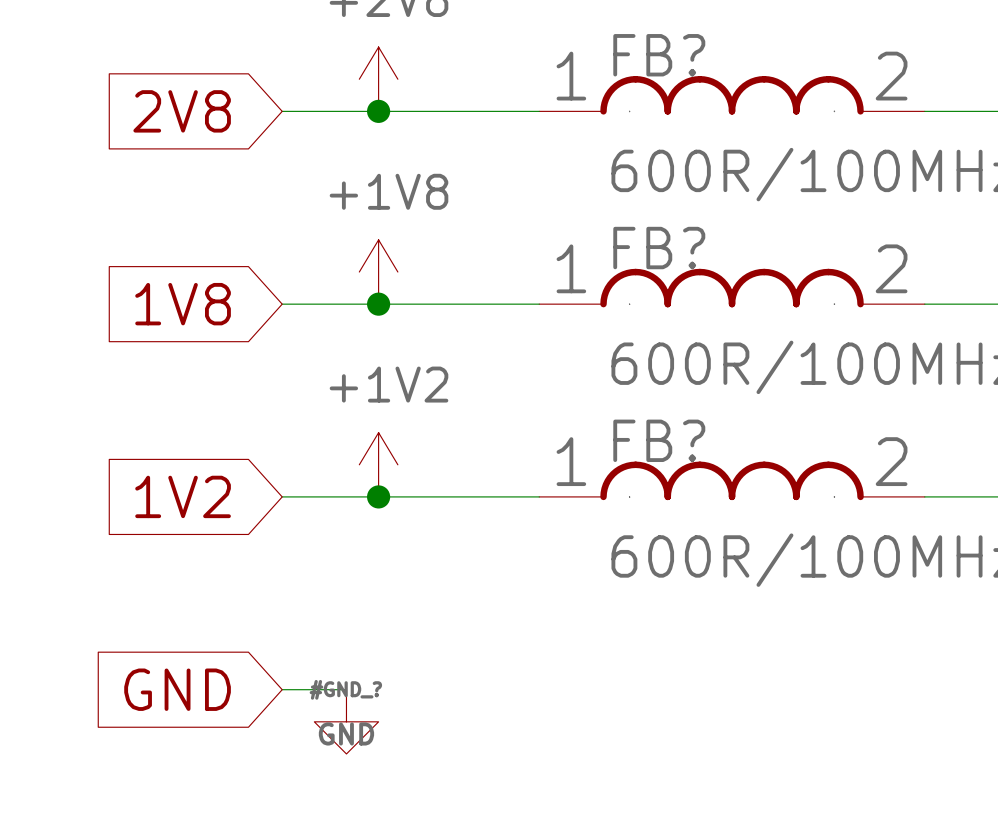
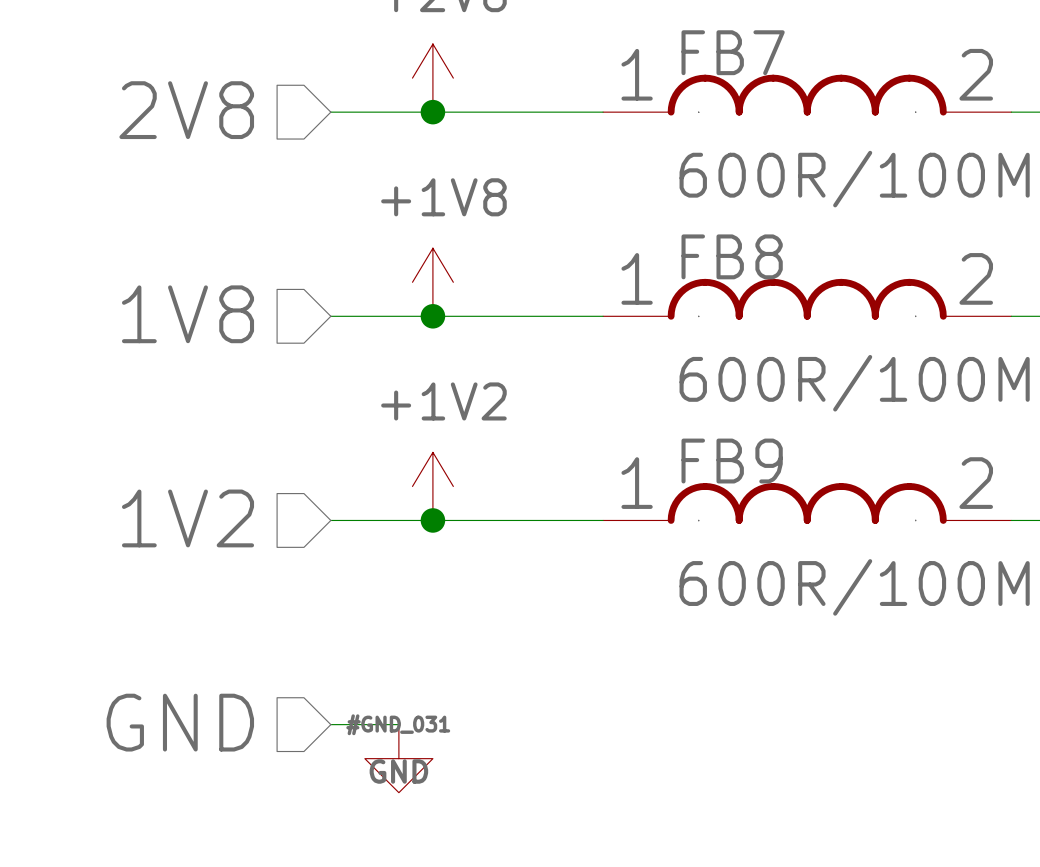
FB? name: FB? (659, 55) -> FB7 (733, 52)
hierarchical label: none -> 2V8 (186, 110)
global label: 2V8 (182, 111) -> none
FB? name: FB? (659, 248) -> FB8 (732, 256)
hierarchical label: none -> 1V8 (188, 314)
global label: 1V8 (183, 304) -> none
FB? name: FB? (659, 440) -> FB9 (732, 461)
hierarchical label: none -> 1V2 (188, 518)
global label: 1V2 (183, 496) -> none
hierarchical label: none -> GND (180, 722)
global label: GND (177, 689) -> none
#GND_? name: #GND_? (345, 689) -> #GND_031 (398, 724)

